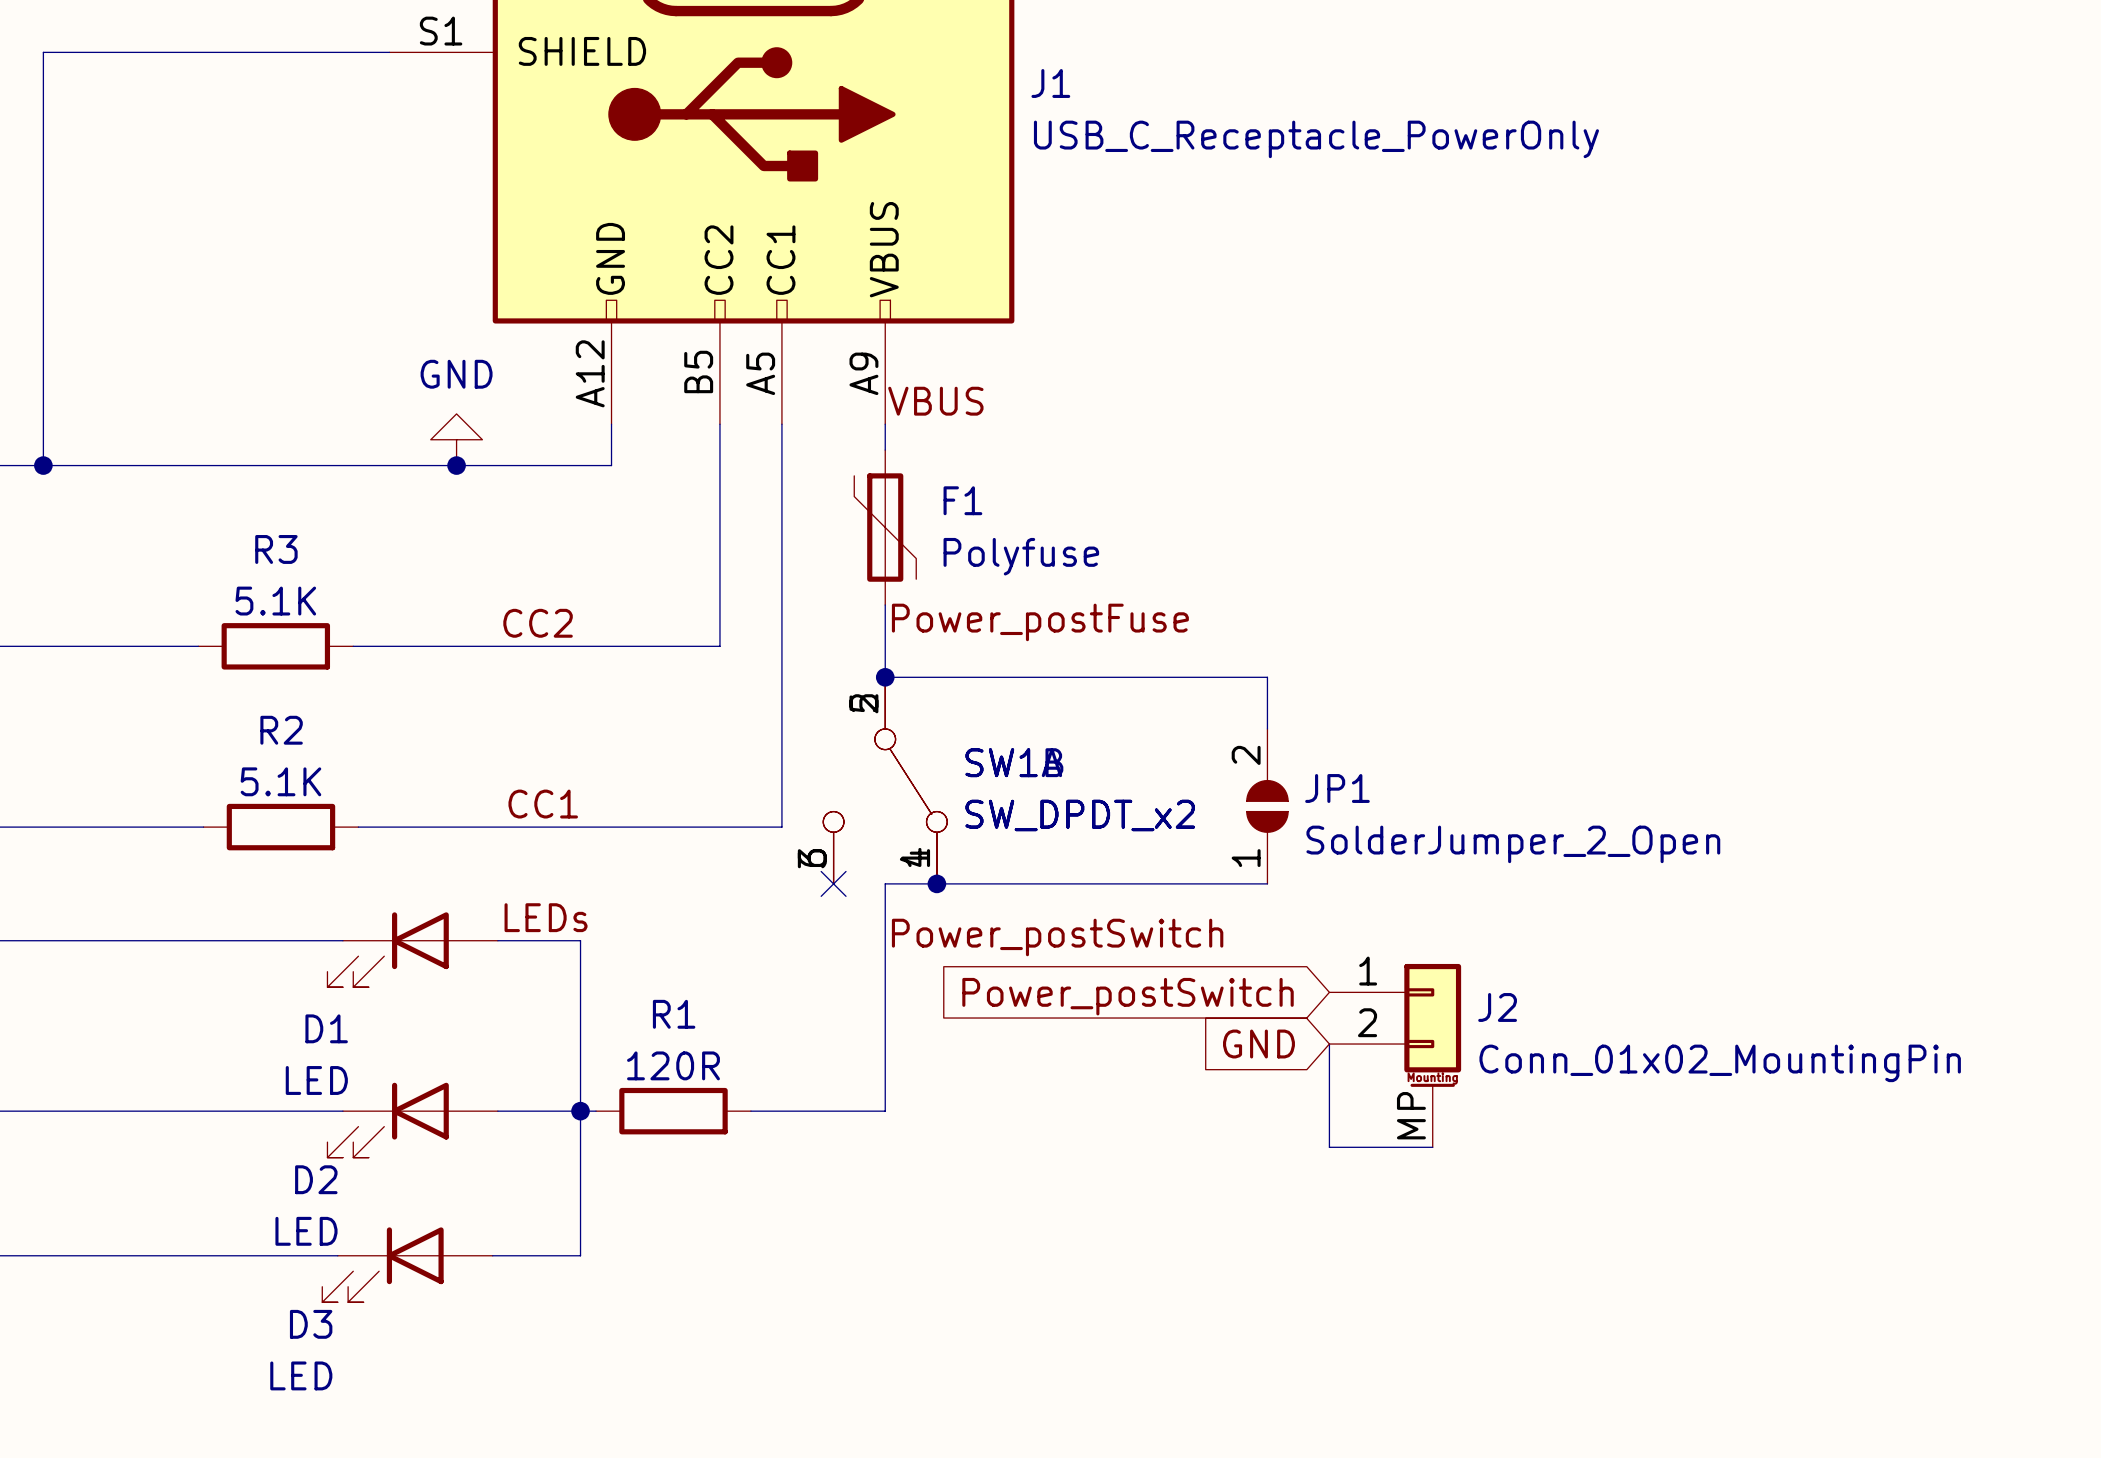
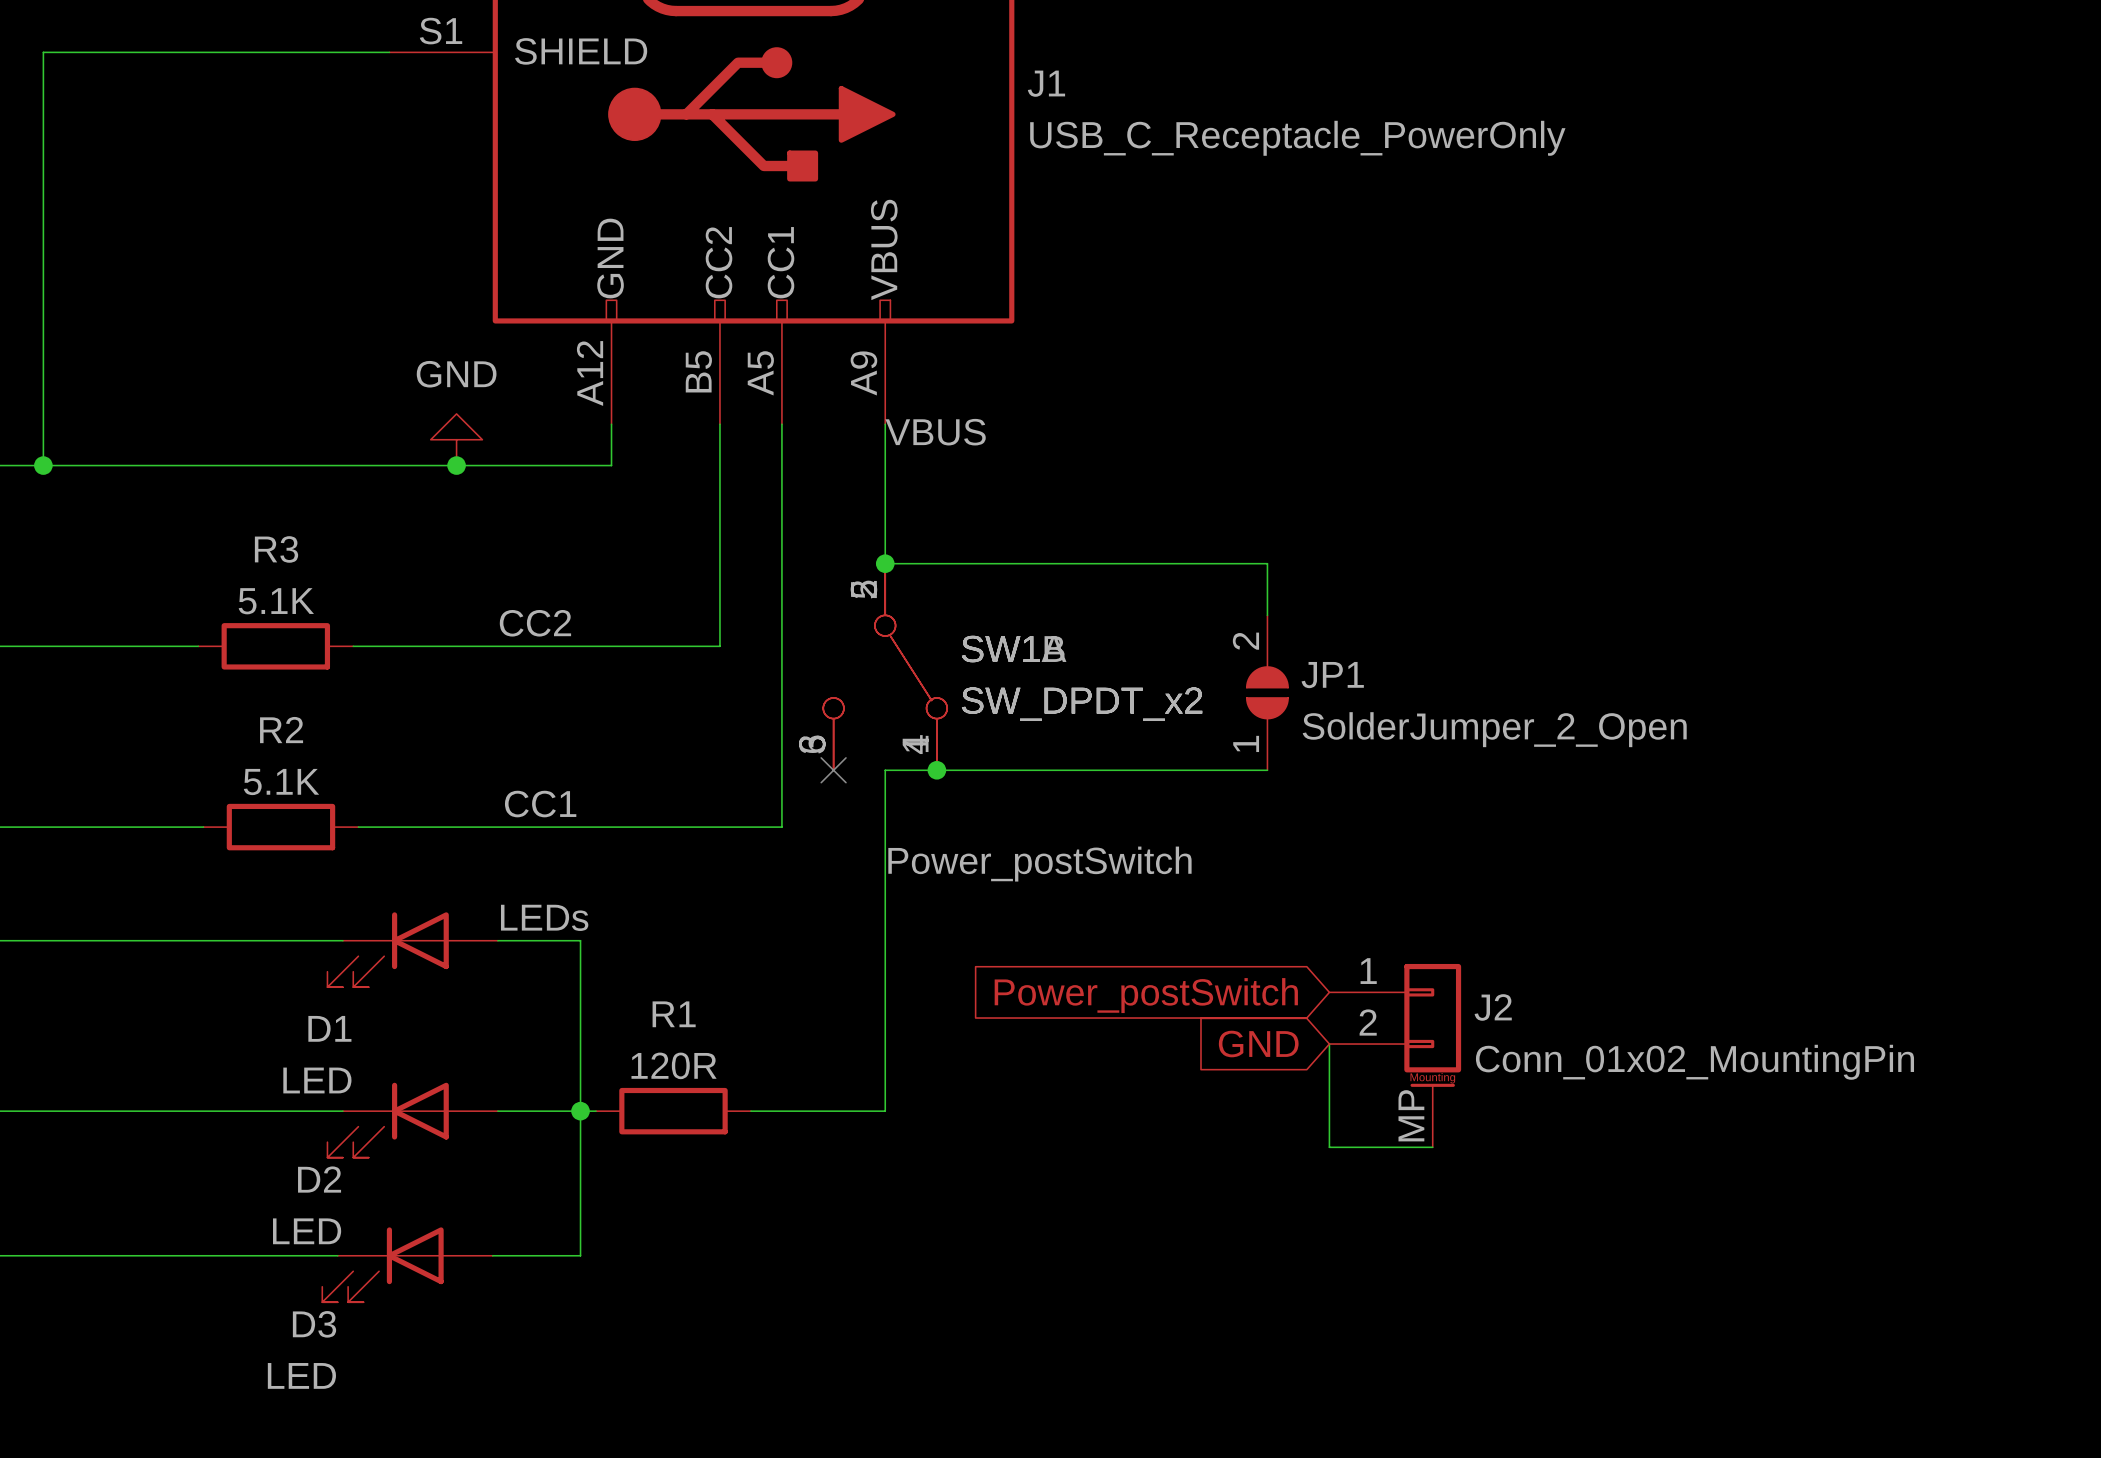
label position: VBUS (935, 401) -> VBUS (935, 432)
wire: none -> (885, 450) (885, 563) (1267, 563) (1267, 615)
F1: Polyfuse (885, 527) -> none
junction: none -> (885, 563)
wire: (885, 605) (885, 677) (1267, 677) (1267, 728) -> none
label: Power_postFuse (1040, 622) -> none
junction: (885, 677) -> none
junction: none -> (936, 770)
part position: (885, 780) -> (885, 666)
part position: (885, 780) -> (885, 666)
JP1 position: (1267, 806) -> (1267, 692)
no-connect mark position: (833, 883) -> (833, 770)
wire: (885, 883) (1267, 883) -> (885, 883) (885, 770) (1267, 770)
junction: (936, 883) -> none
label position: Power_postSwitch (1057, 937) -> Power_postSwitch (1039, 864)

